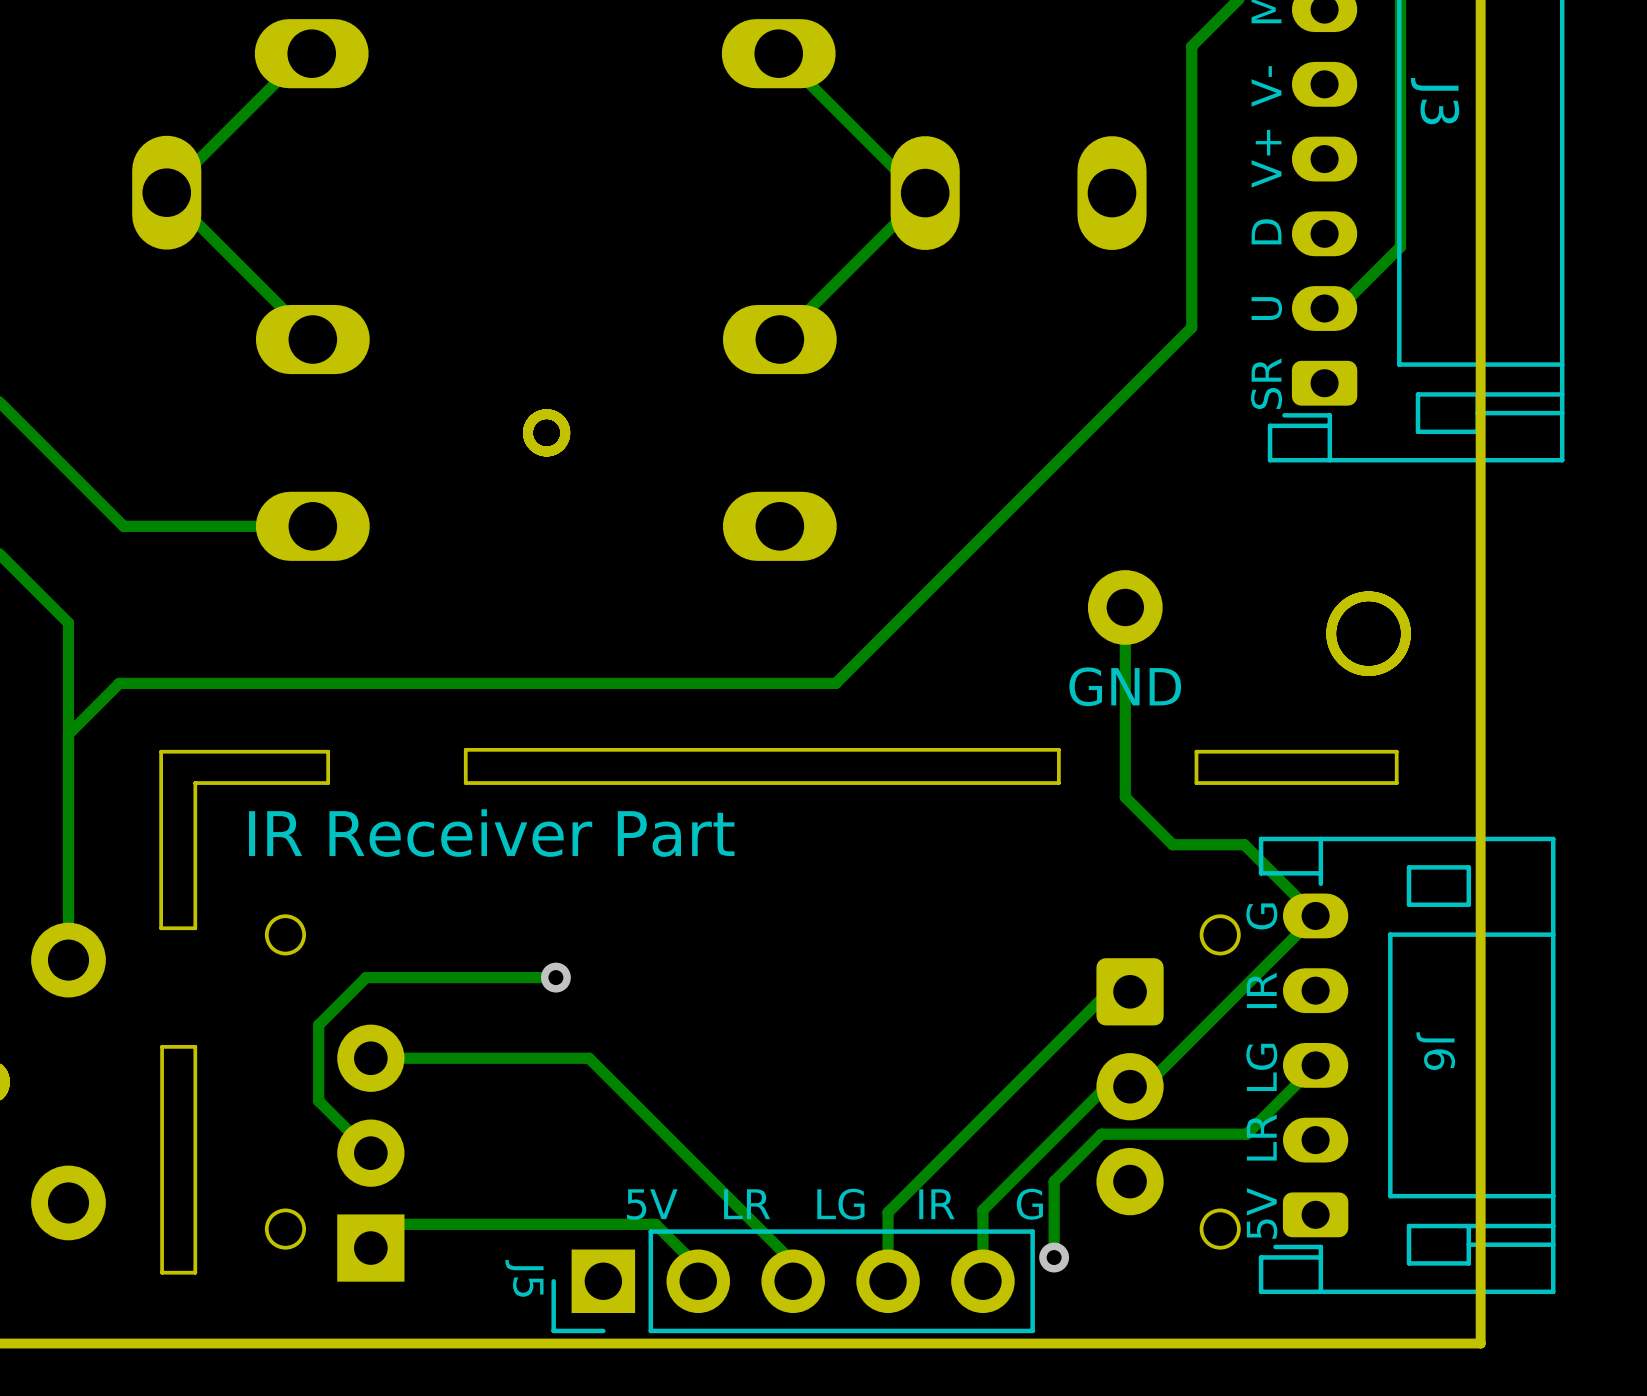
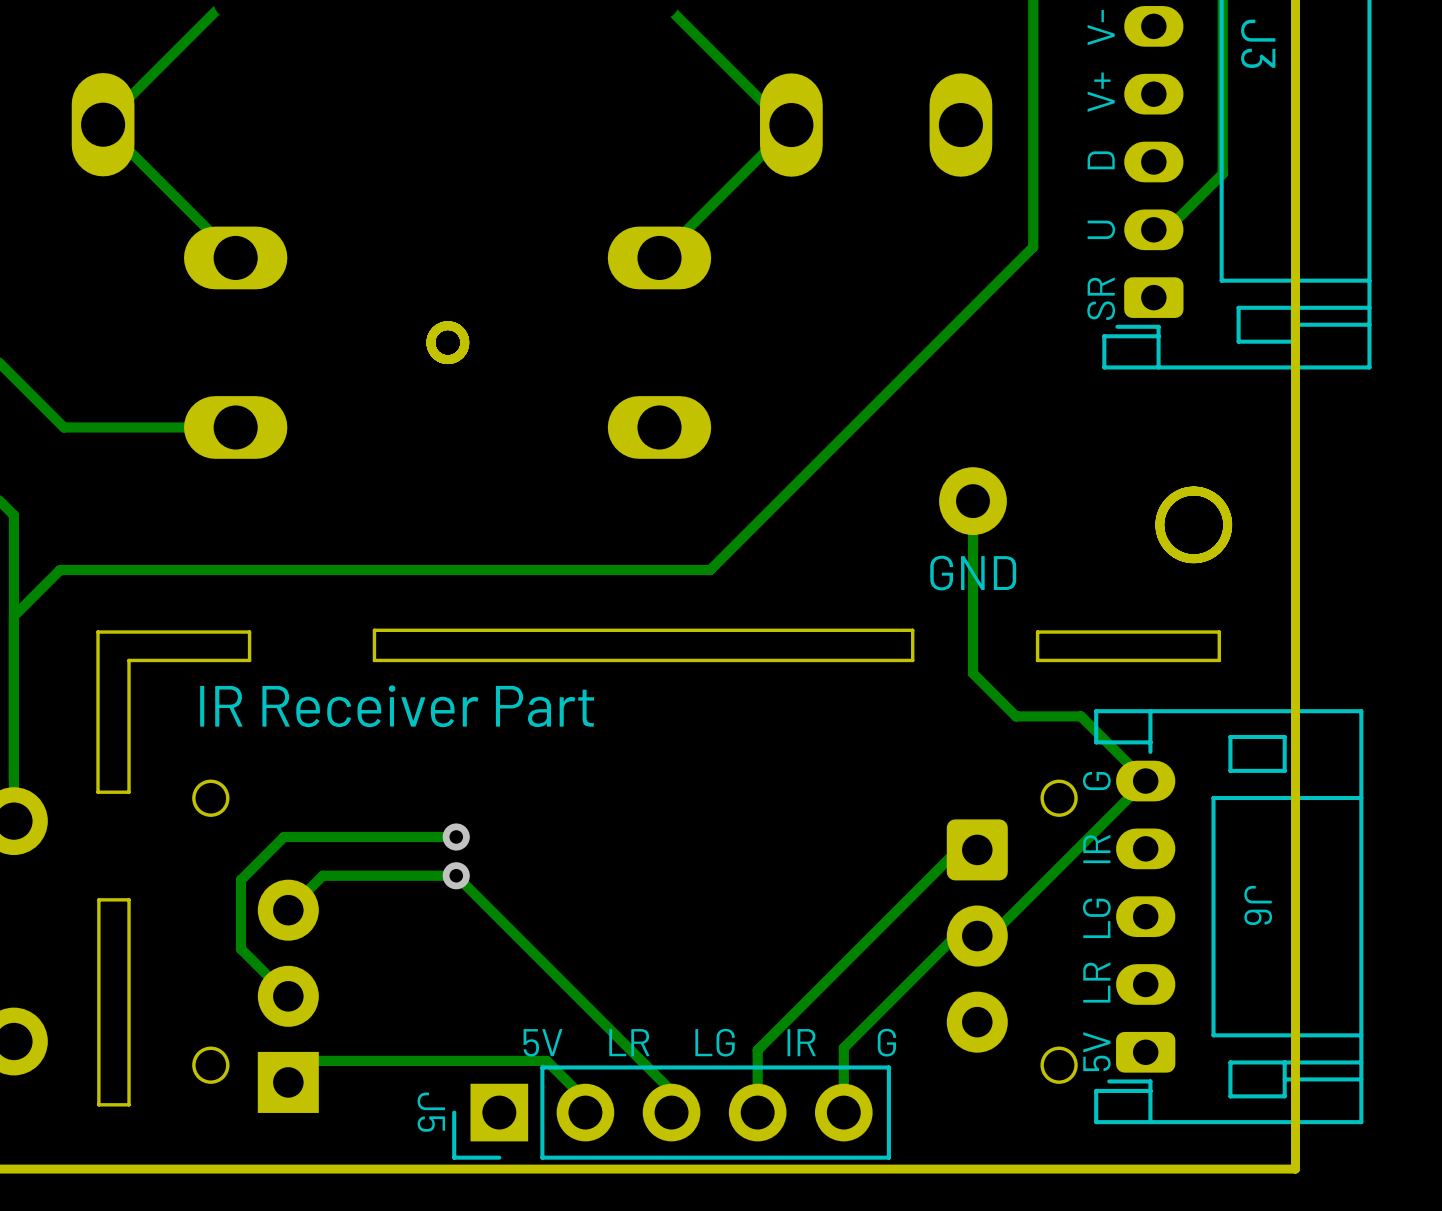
via: none -> (456, 875)
track: (370, 1058) (589, 1058) (793, 1262) -> (288, 910) (322, 875) (456, 875) (671, 1091) (671, 1095)
track: (1315, 1065) (1246, 1134) (1101, 1134) (1054, 1181) (1054, 1257) -> none
via: (1054, 1257) -> none

